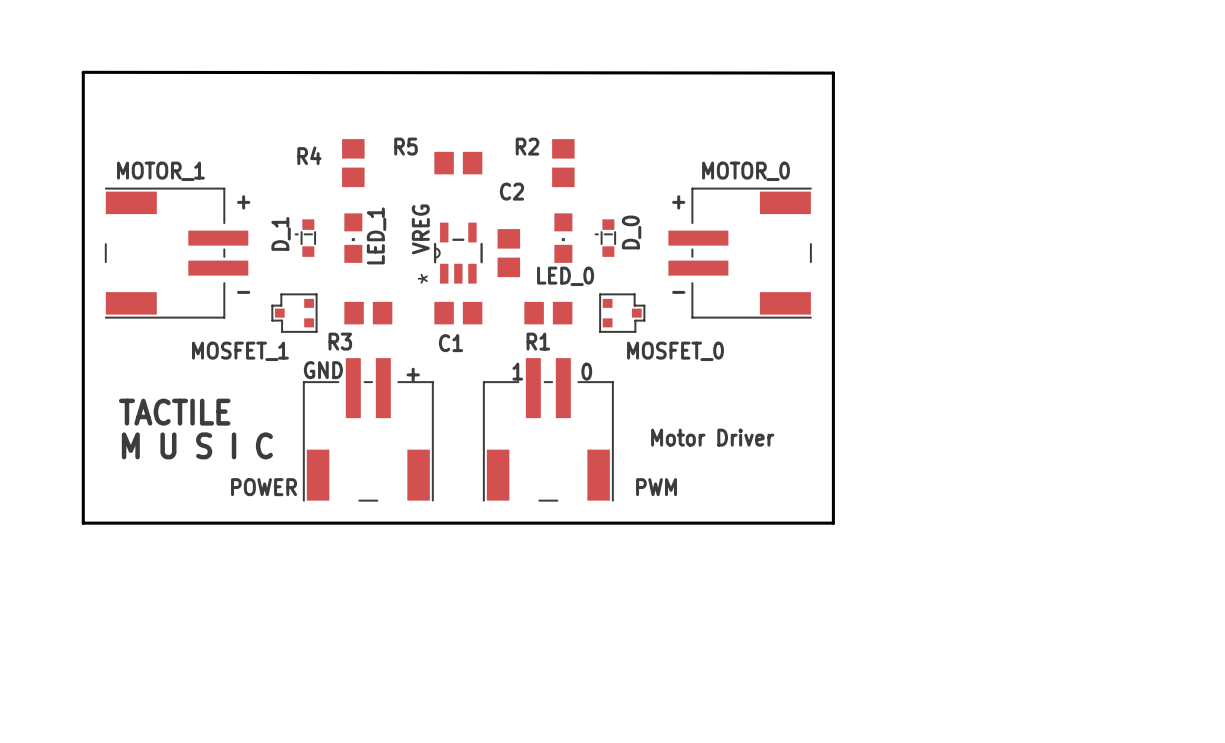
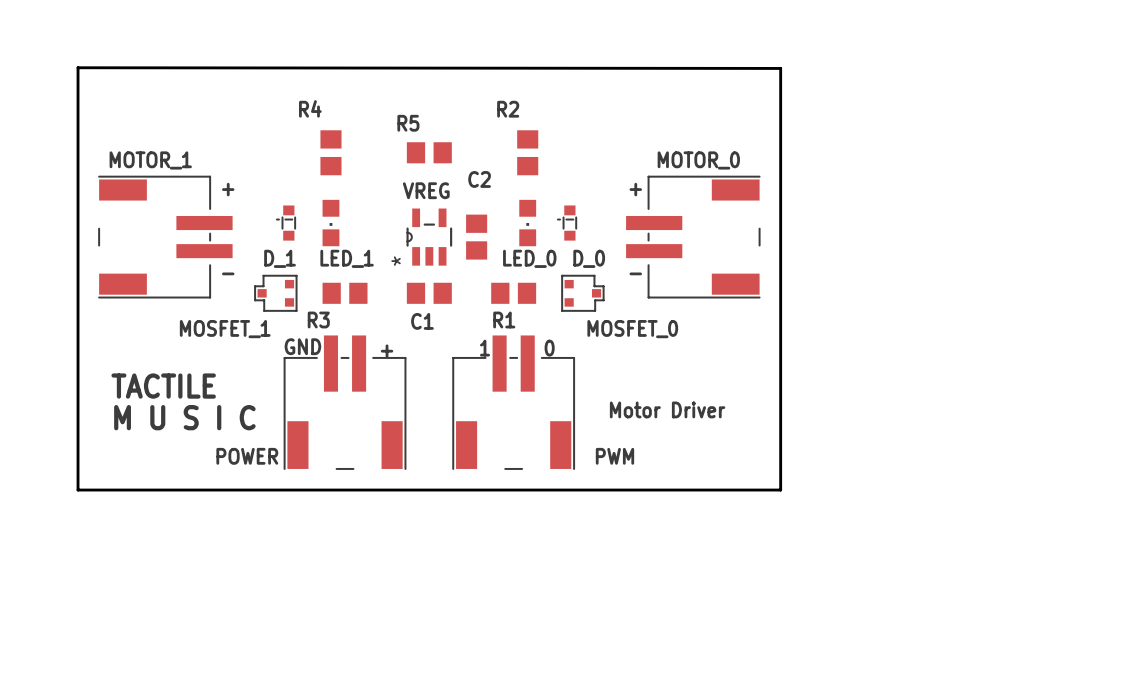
R5 name position: R5 (406, 146) -> R5 (408, 123)
R2 name position: R2 (527, 146) -> R2 (508, 109)
R4 name position: R4 (309, 155) -> R4 (310, 108)
VREG name rotation: 0° (420, 229) -> 90° clockwise (426, 190)
D_0 name rotation: 0° (631, 232) -> 90° clockwise (589, 258)
D_0 name position: D_0 (631, 232) -> D_0 (589, 258)
D_1 name rotation: 0° (281, 233) -> 90° clockwise (280, 258)
D_1 name position: D_1 (281, 233) -> D_1 (280, 258)
LED_1 name rotation: 0° (376, 235) -> 90° clockwise (347, 258)

